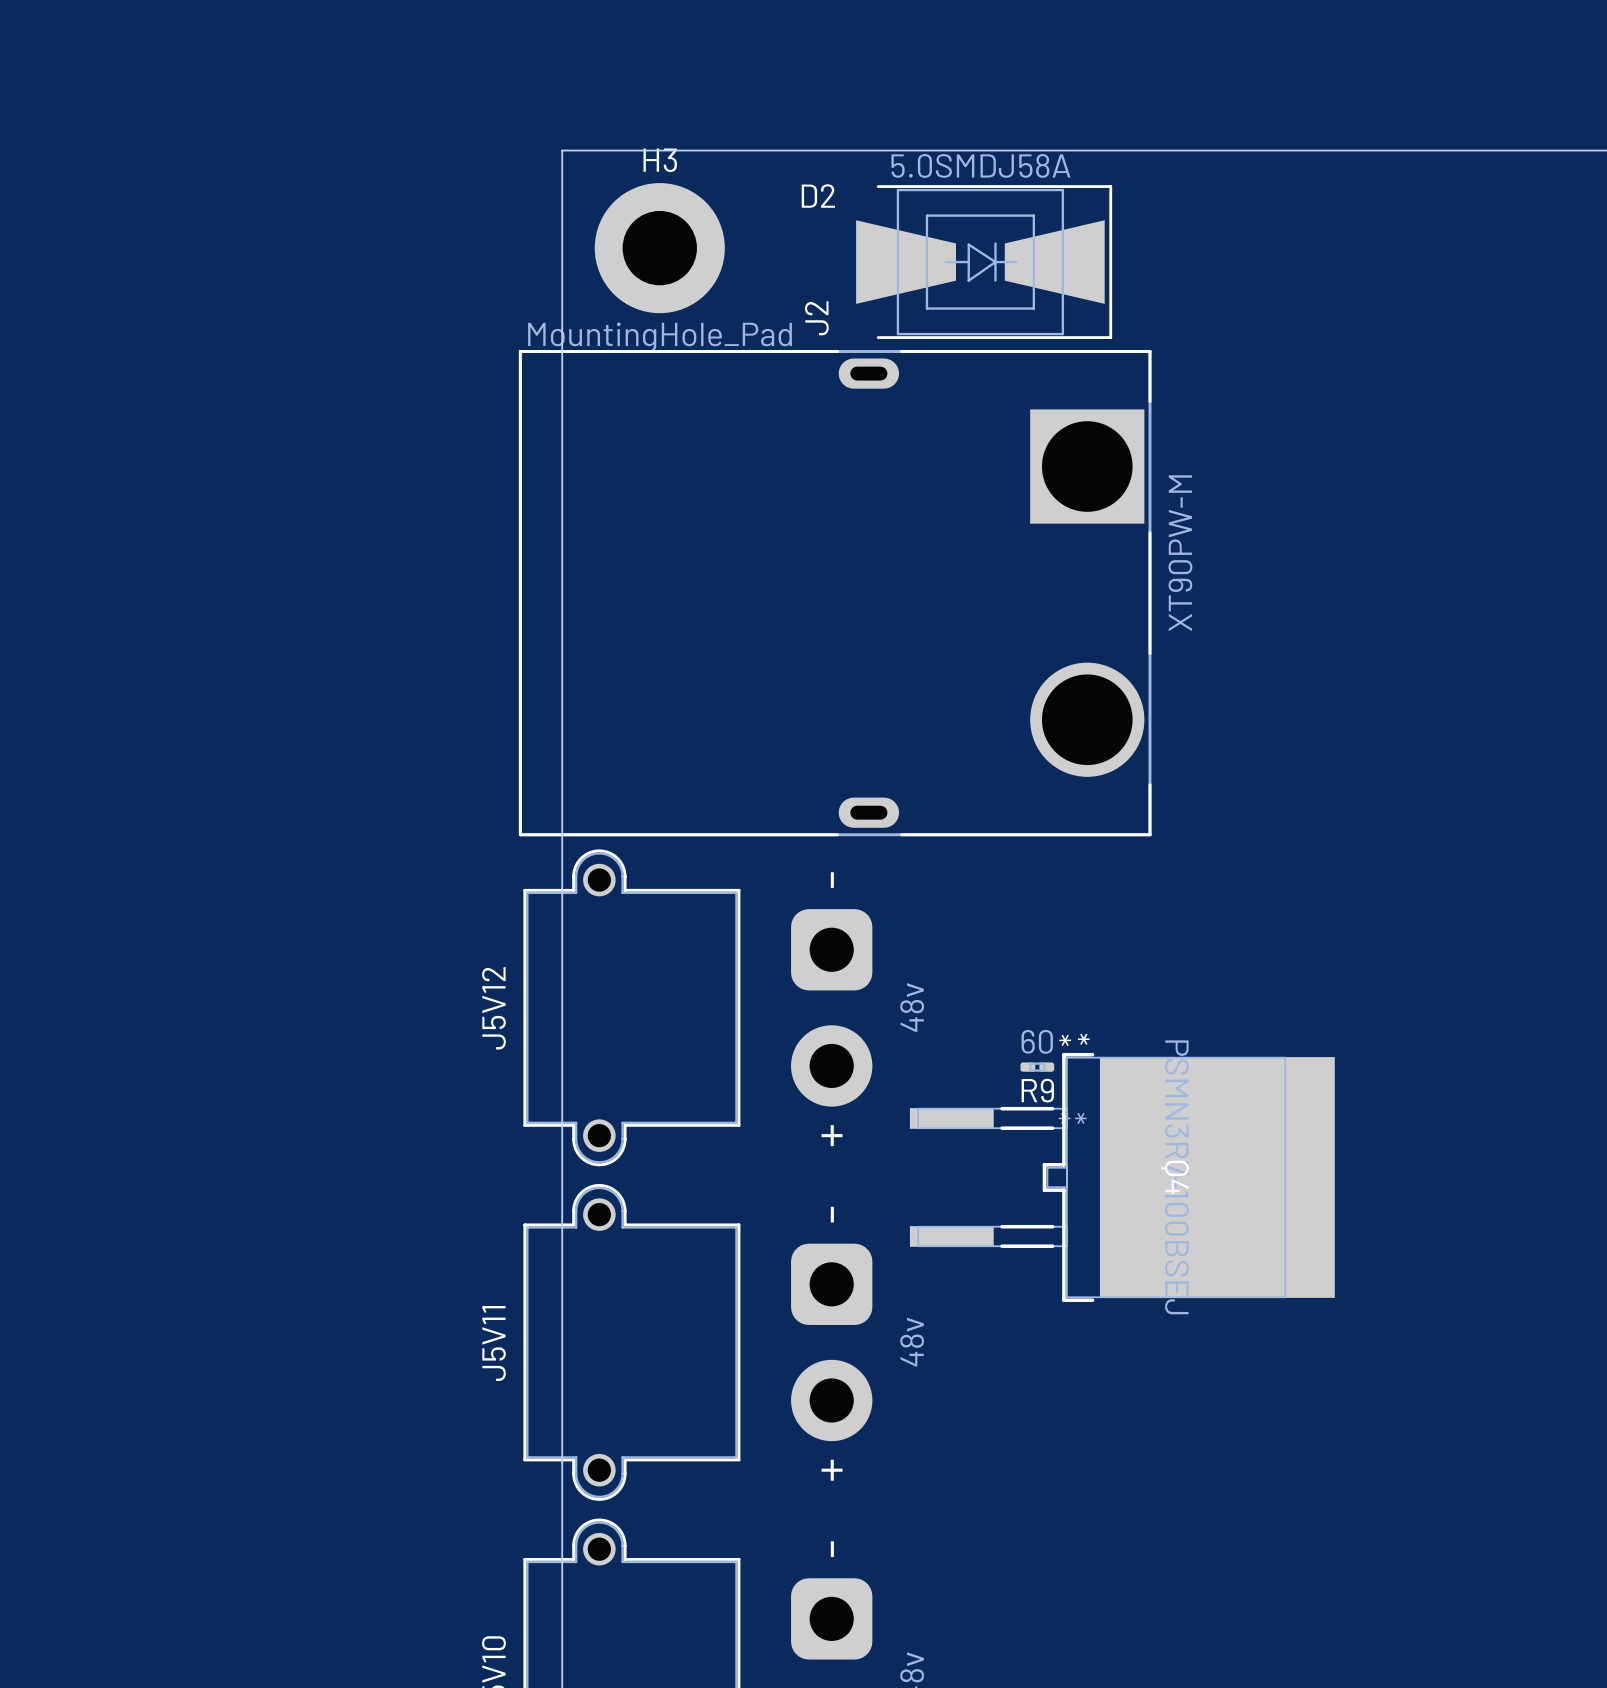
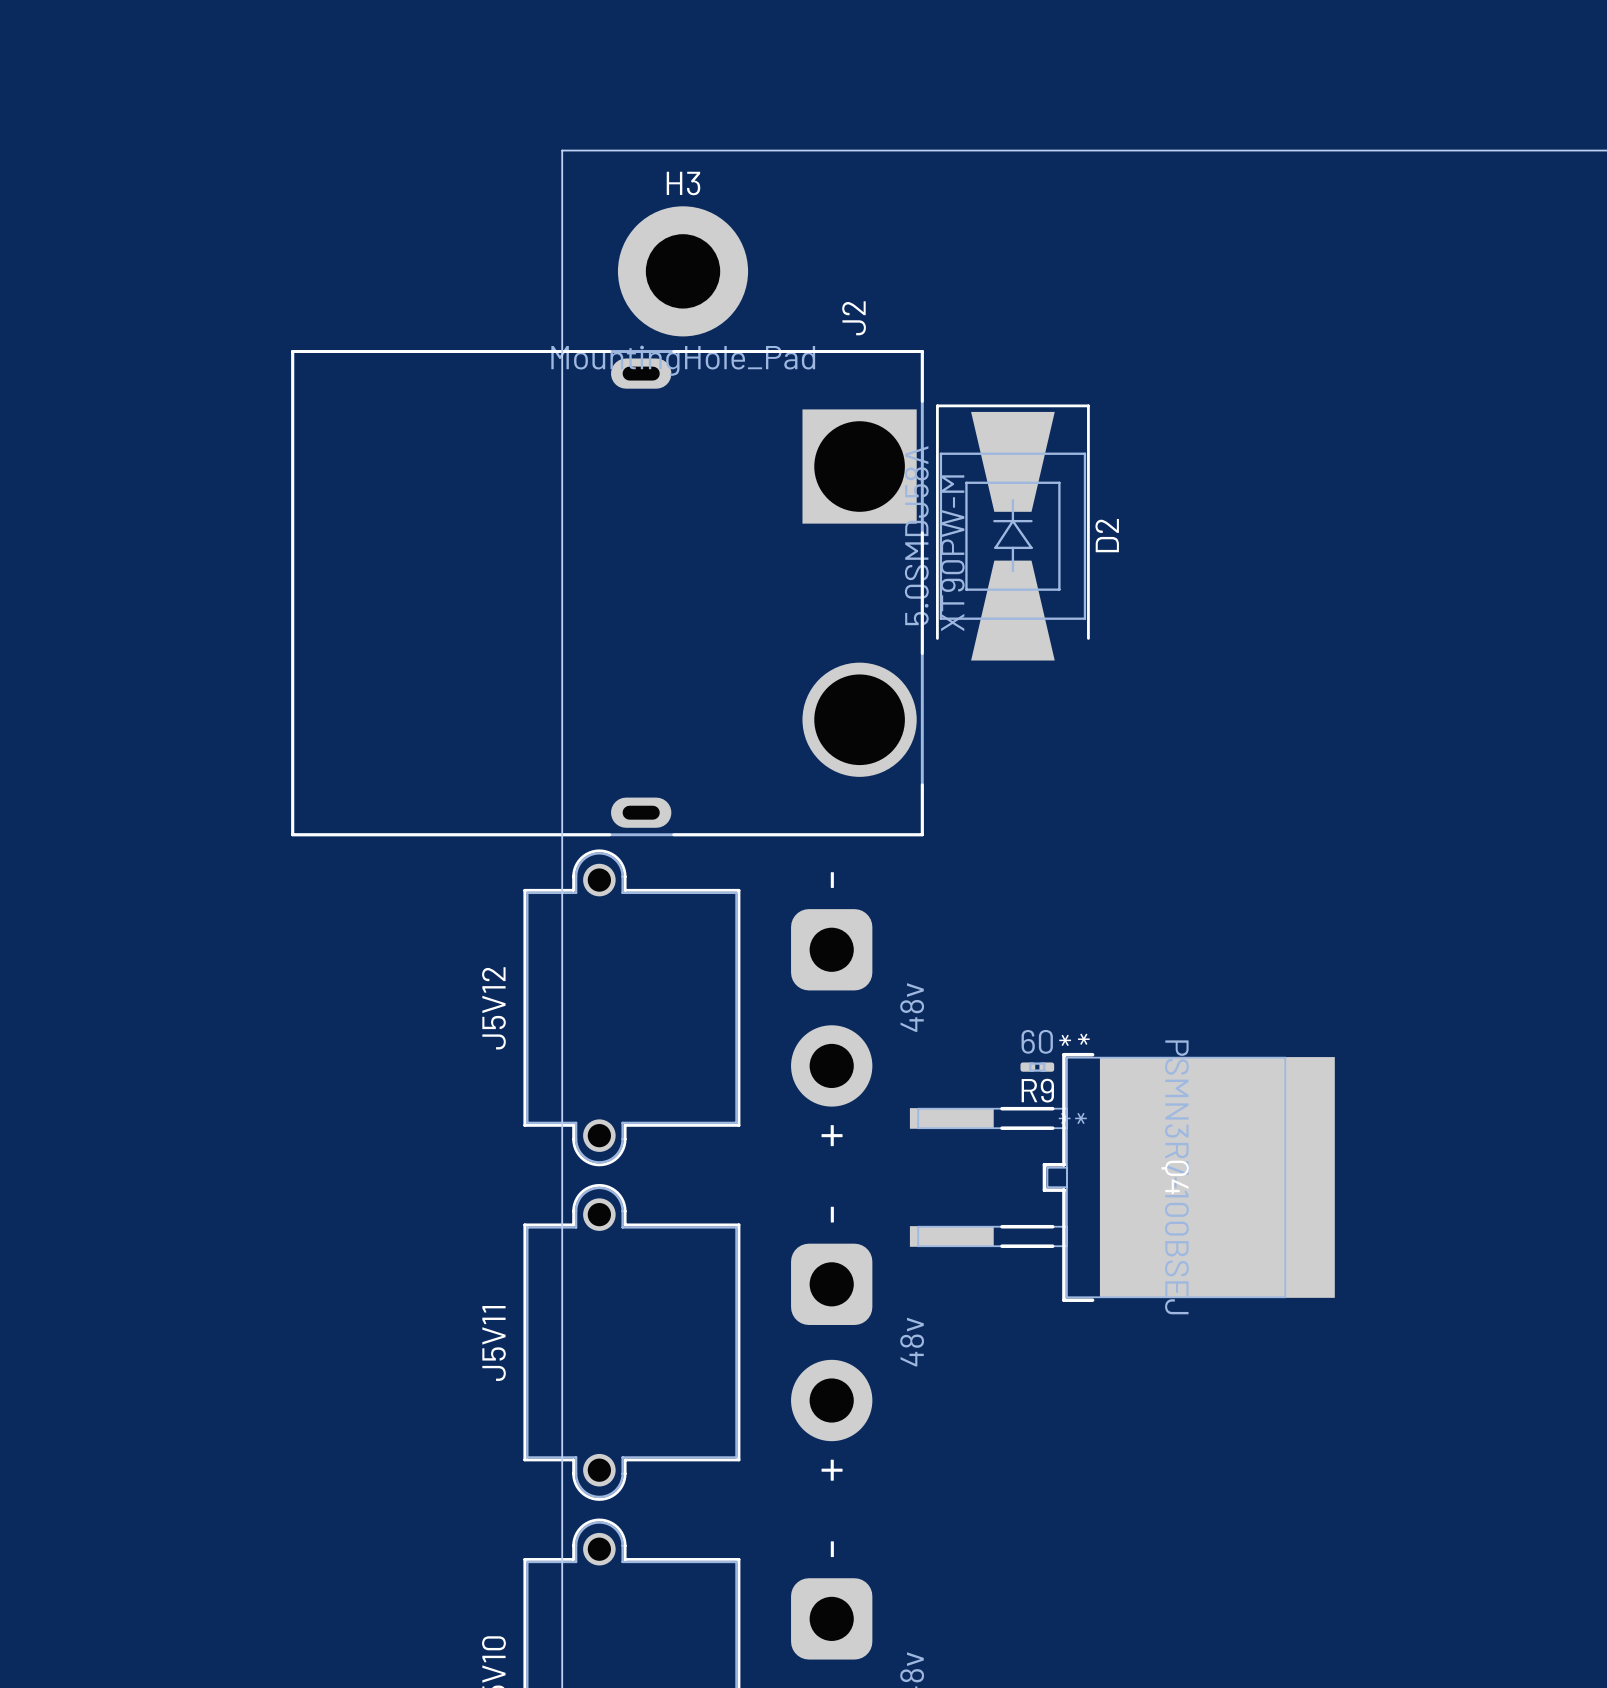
D2 name position: D2 (818, 196) -> D2 (1107, 535)
H3 position: (659, 248) -> (683, 271)
D2 rotation: 0° (984, 262) -> 90° counterclockwise (1012, 532)
D2 position: (984, 262) -> (1012, 532)
J2 name position: J2 (816, 318) -> J2 (854, 318)
J2 position: (835, 593) -> (607, 593)

